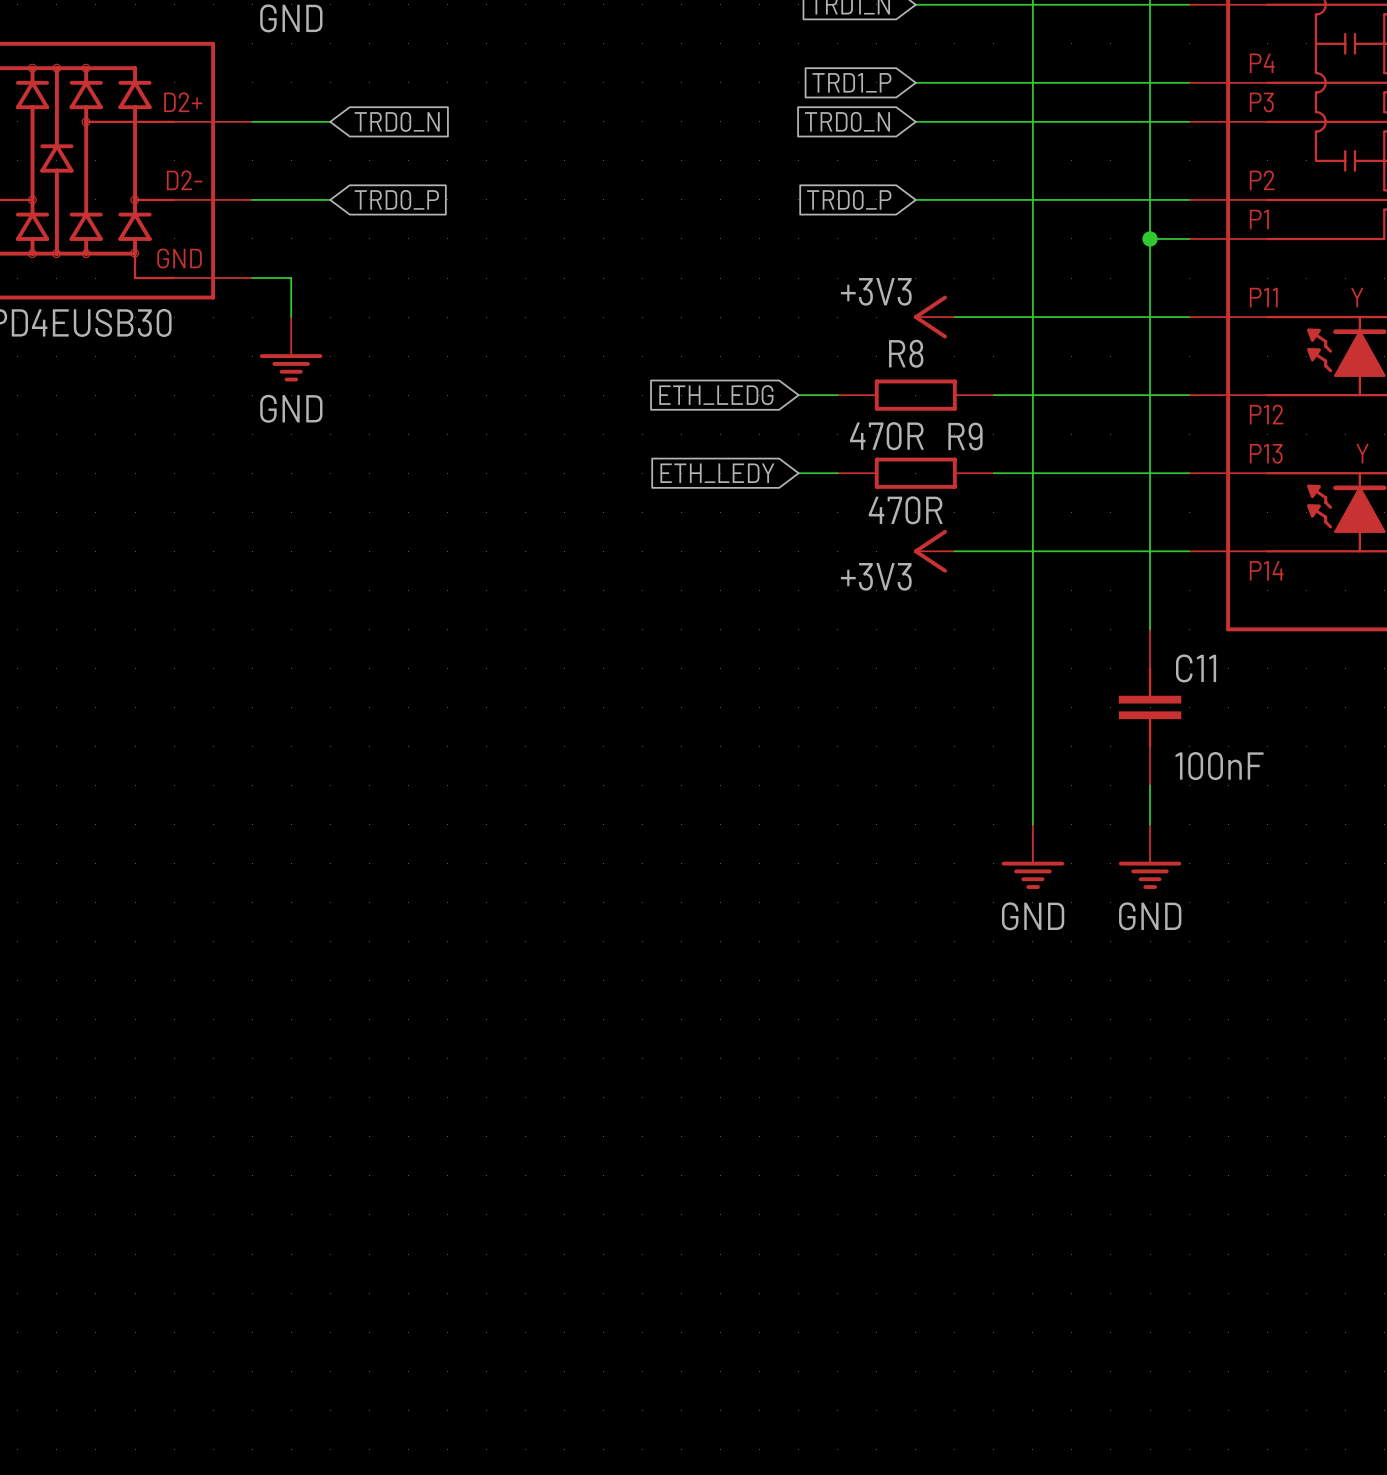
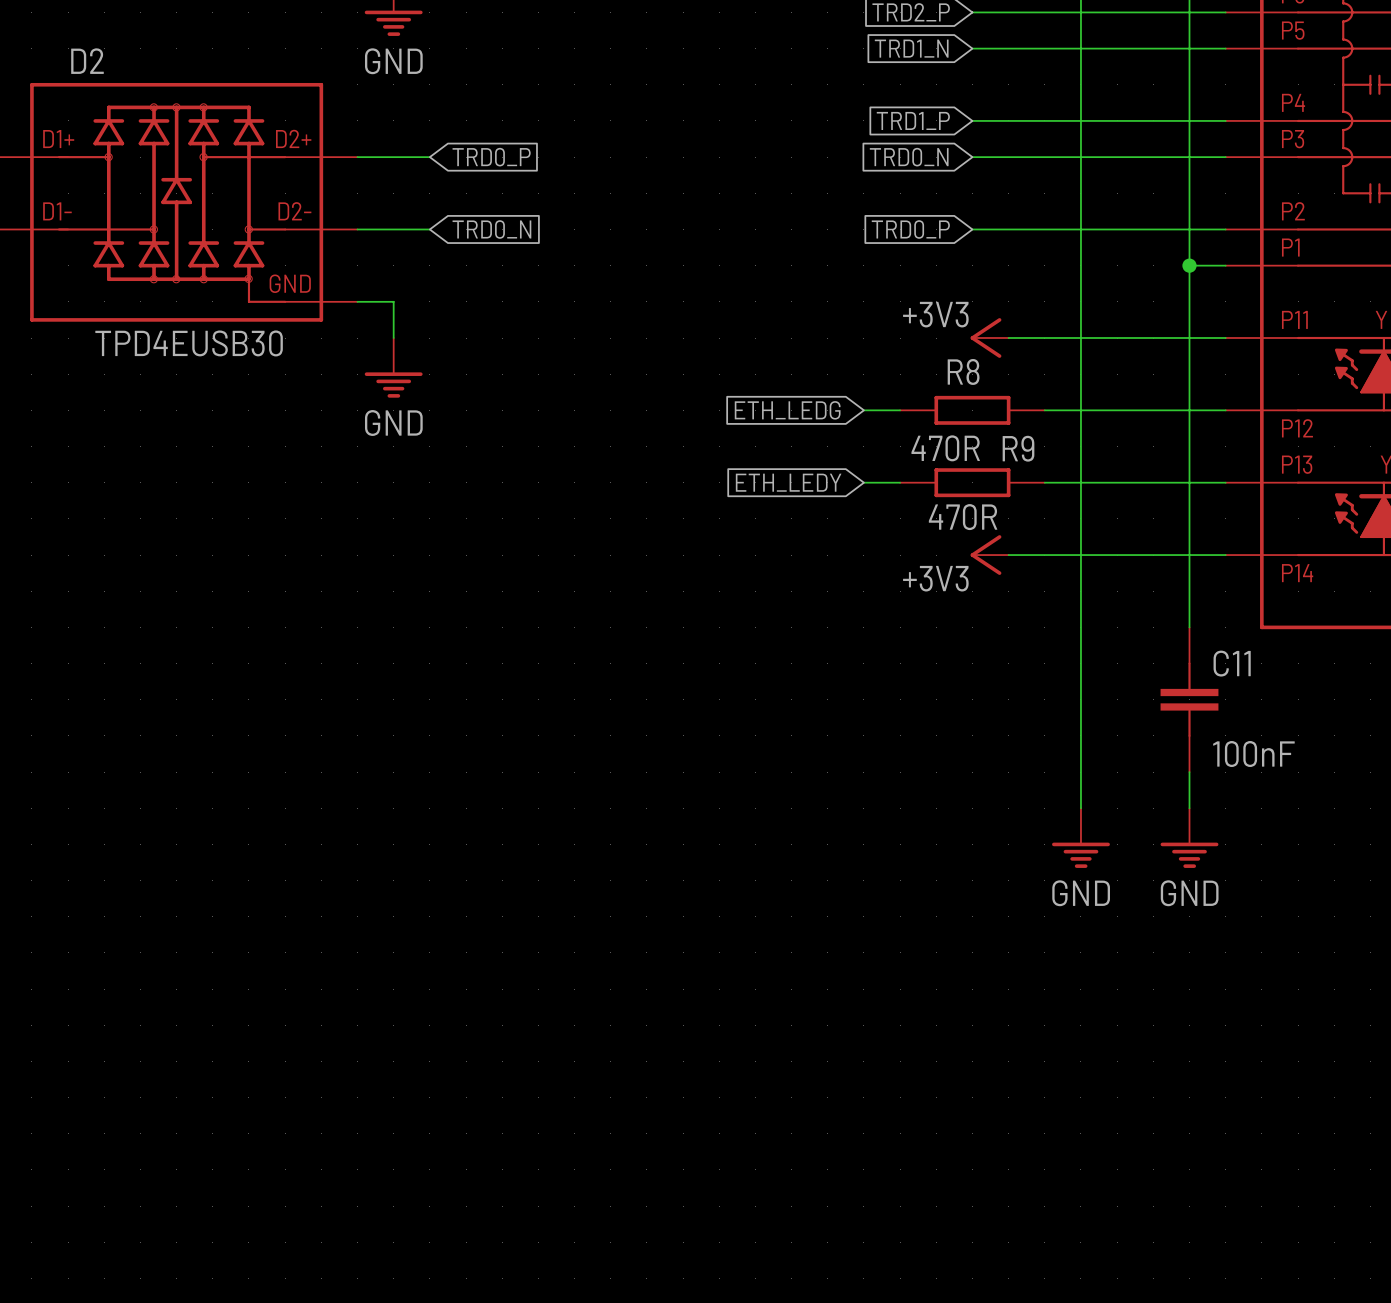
global label: TRD0_N (397, 121) -> TRD0_P (491, 157)
global label: TRD0_P (396, 199) -> TRD0_N (491, 229)

